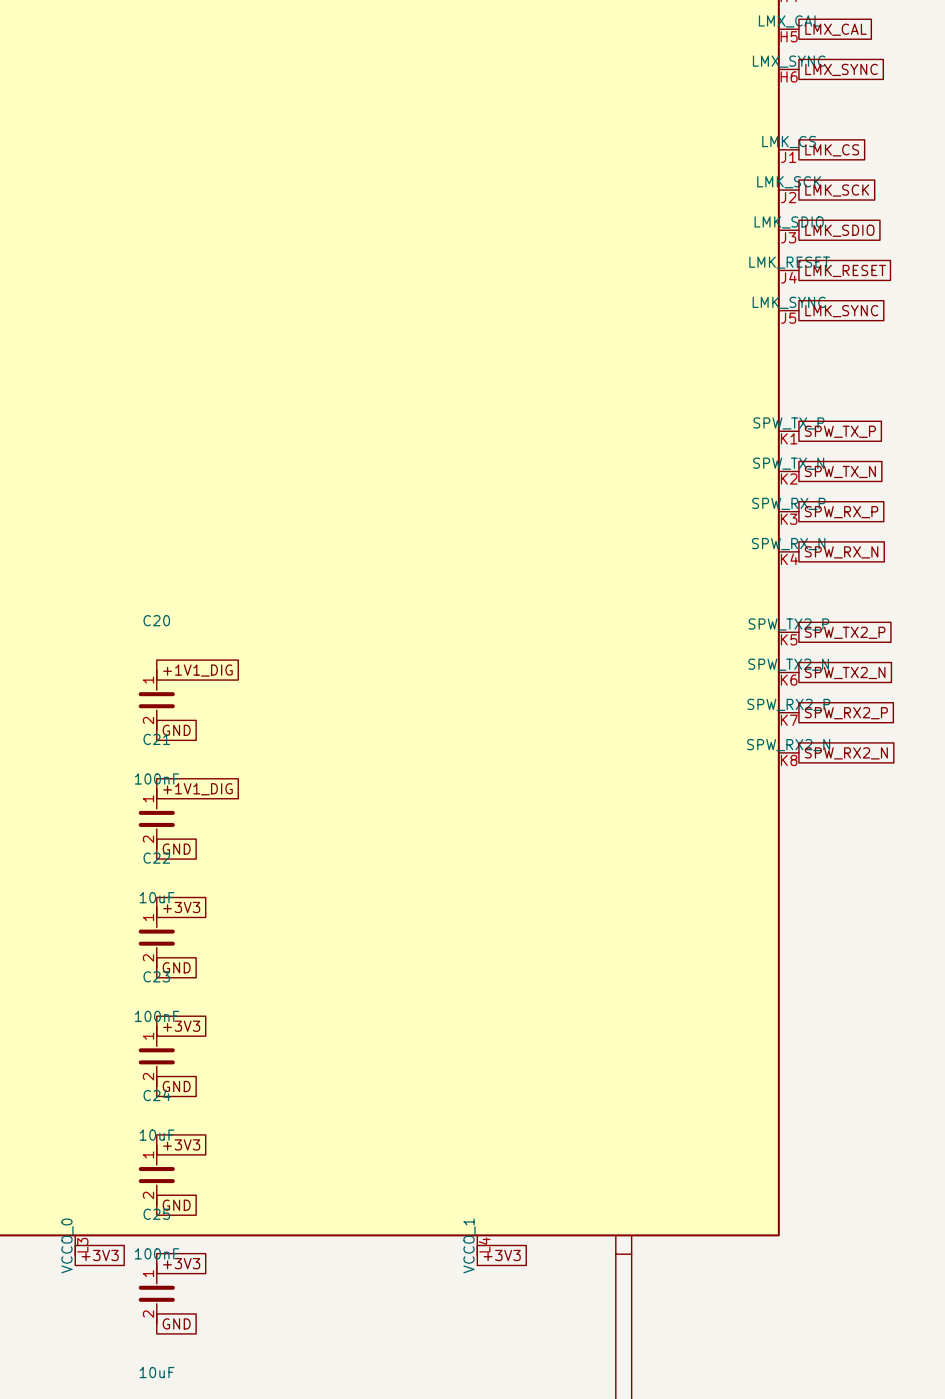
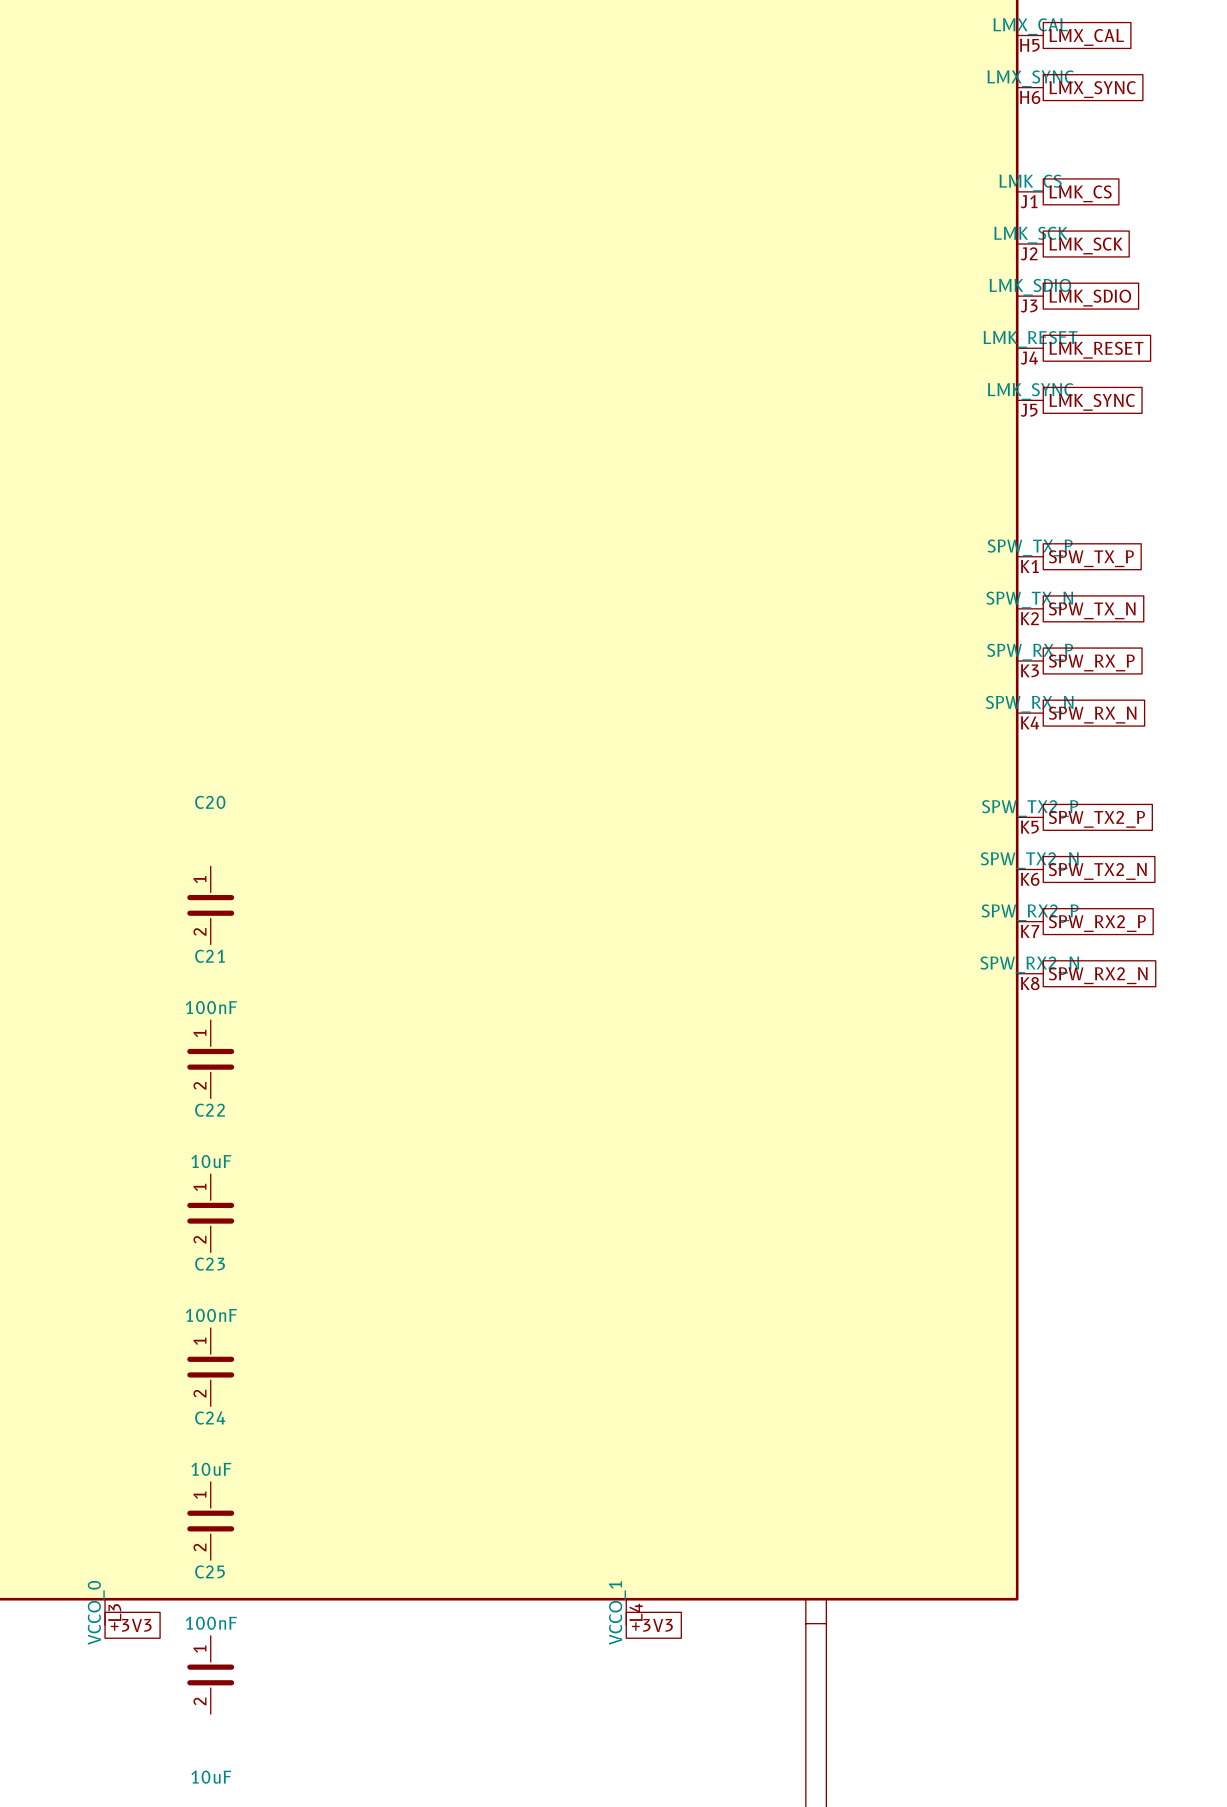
global label: +1V1_DIG (197, 670) -> none
global label: GND (176, 730) -> none
global label: +1V1_DIG (197, 789) -> none
global label: GND (176, 849) -> none
global label: +3V3 (181, 907) -> none
global label: GND (176, 967) -> none
global label: +3V3 (181, 1026) -> none
global label: GND (176, 1086) -> none
global label: +3V3 (181, 1144) -> none
global label: GND (176, 1205) -> none
global label: +3V3 (181, 1263) -> none
global label: GND (176, 1323) -> none

